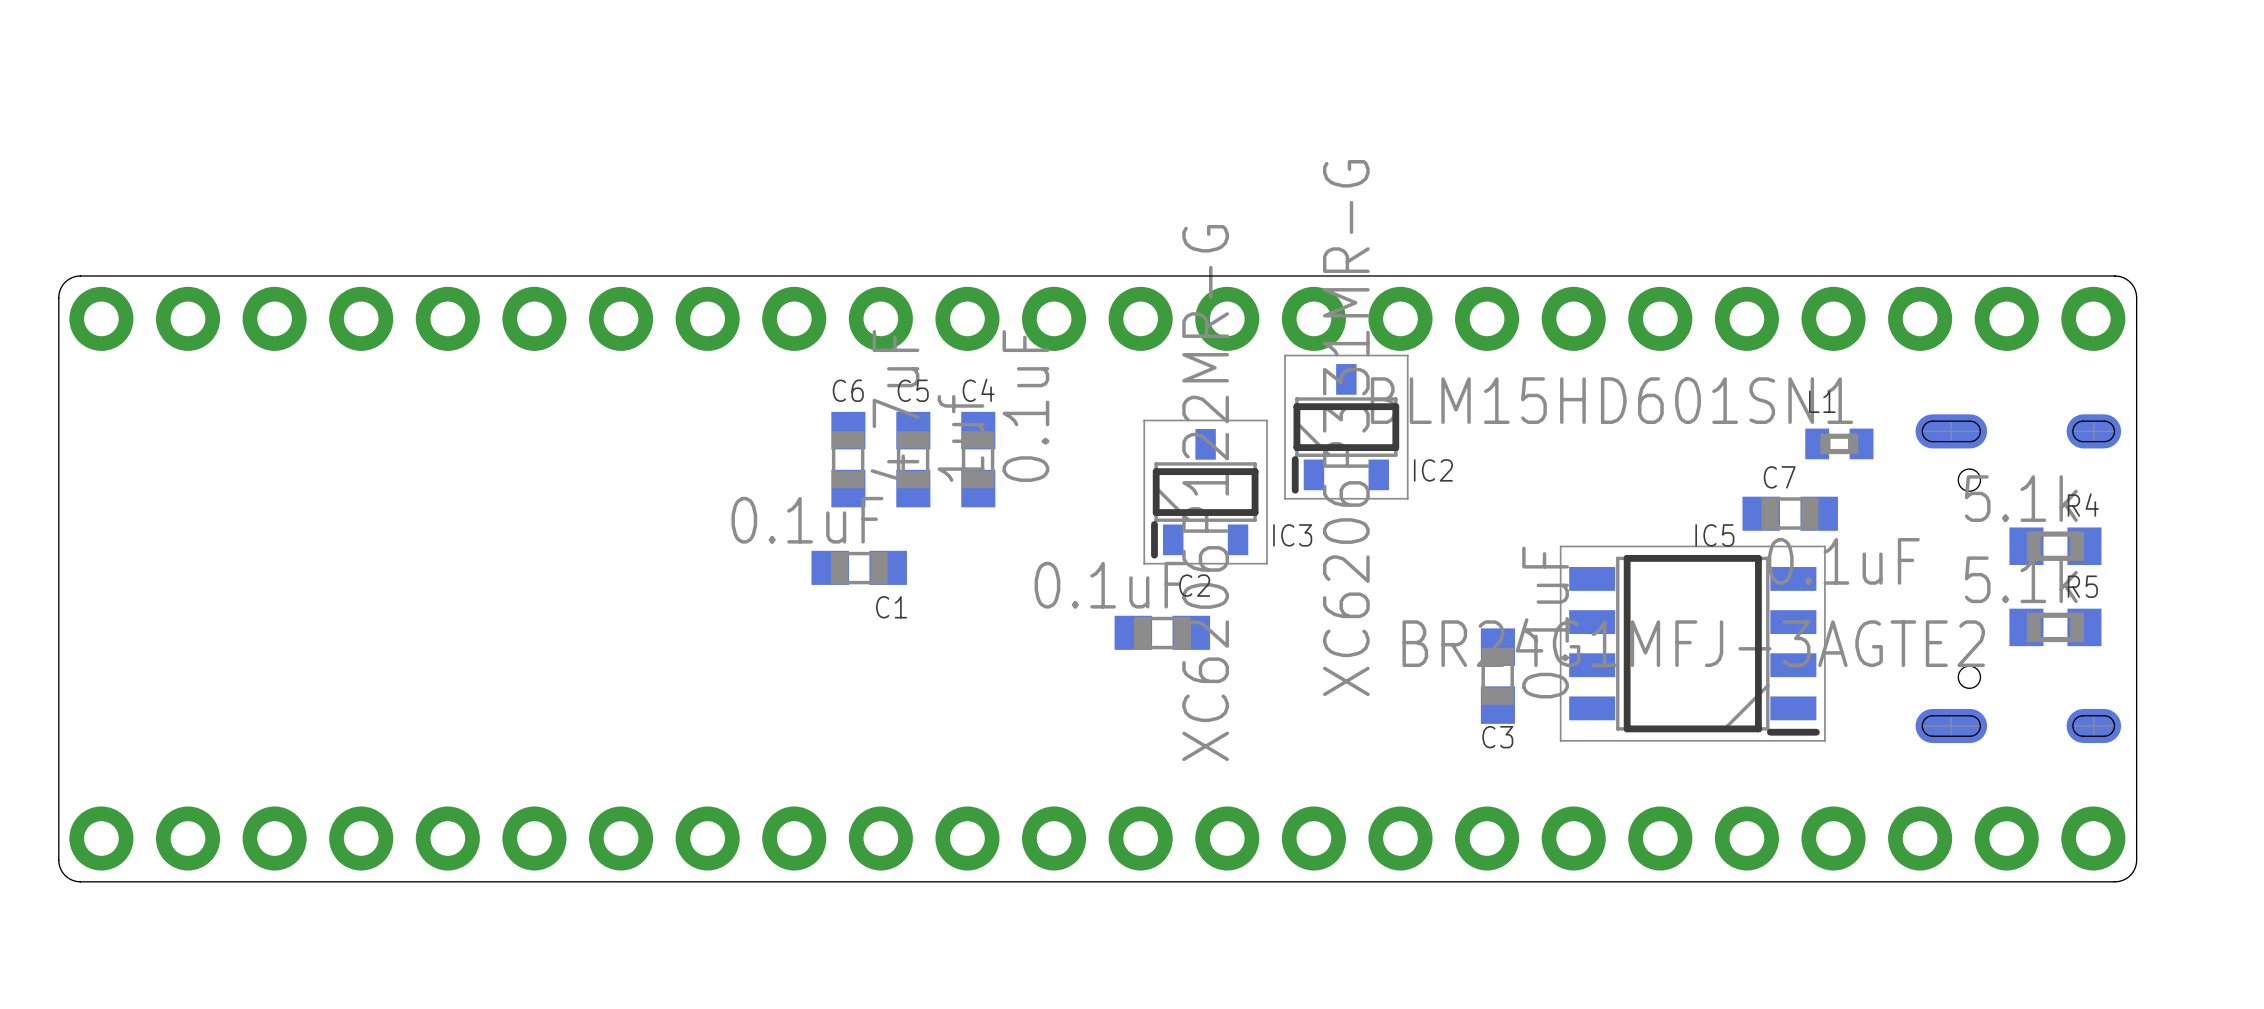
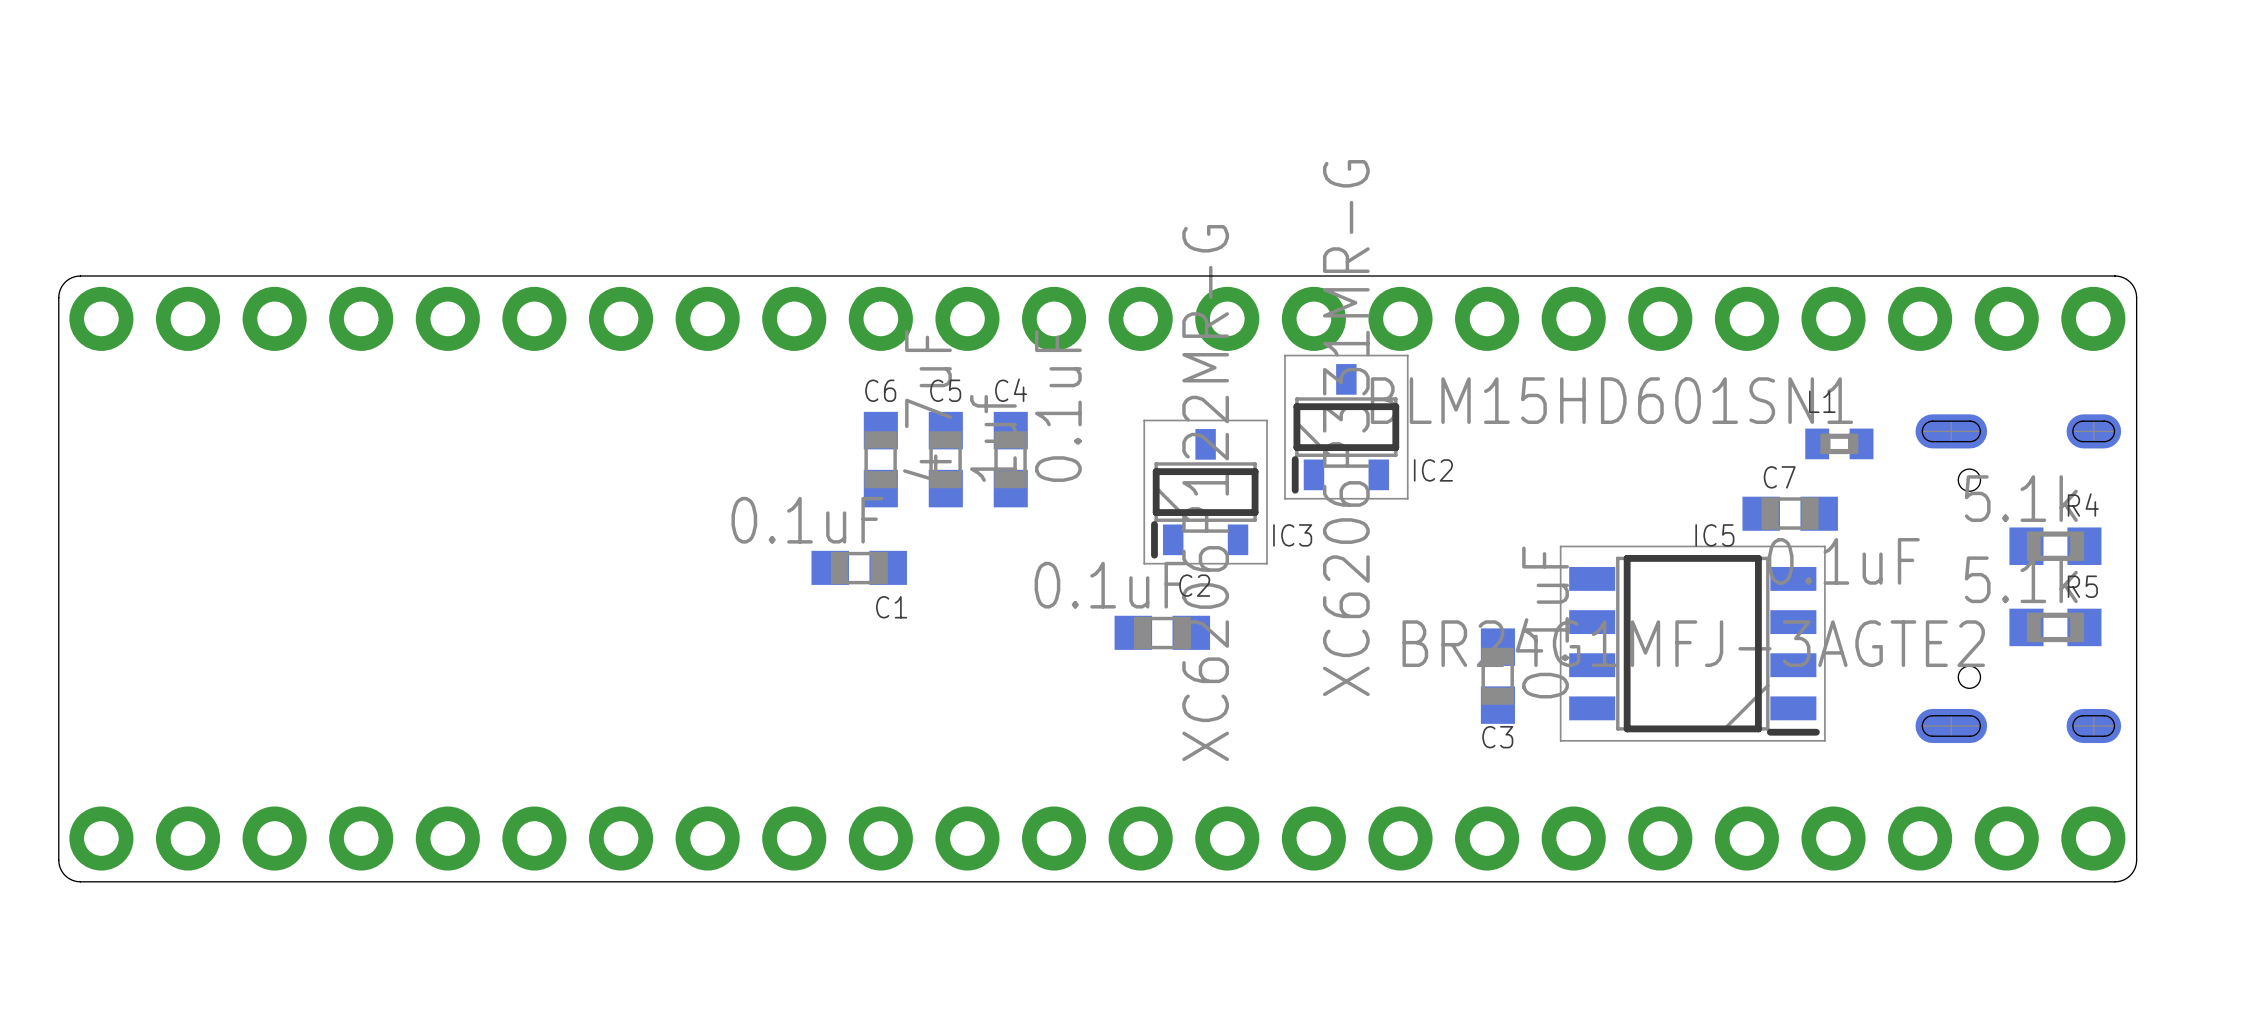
C6 position: (848, 459) -> (880, 459)
C5 position: (913, 459) -> (945, 459)
C4 position: (978, 459) -> (1010, 459)

